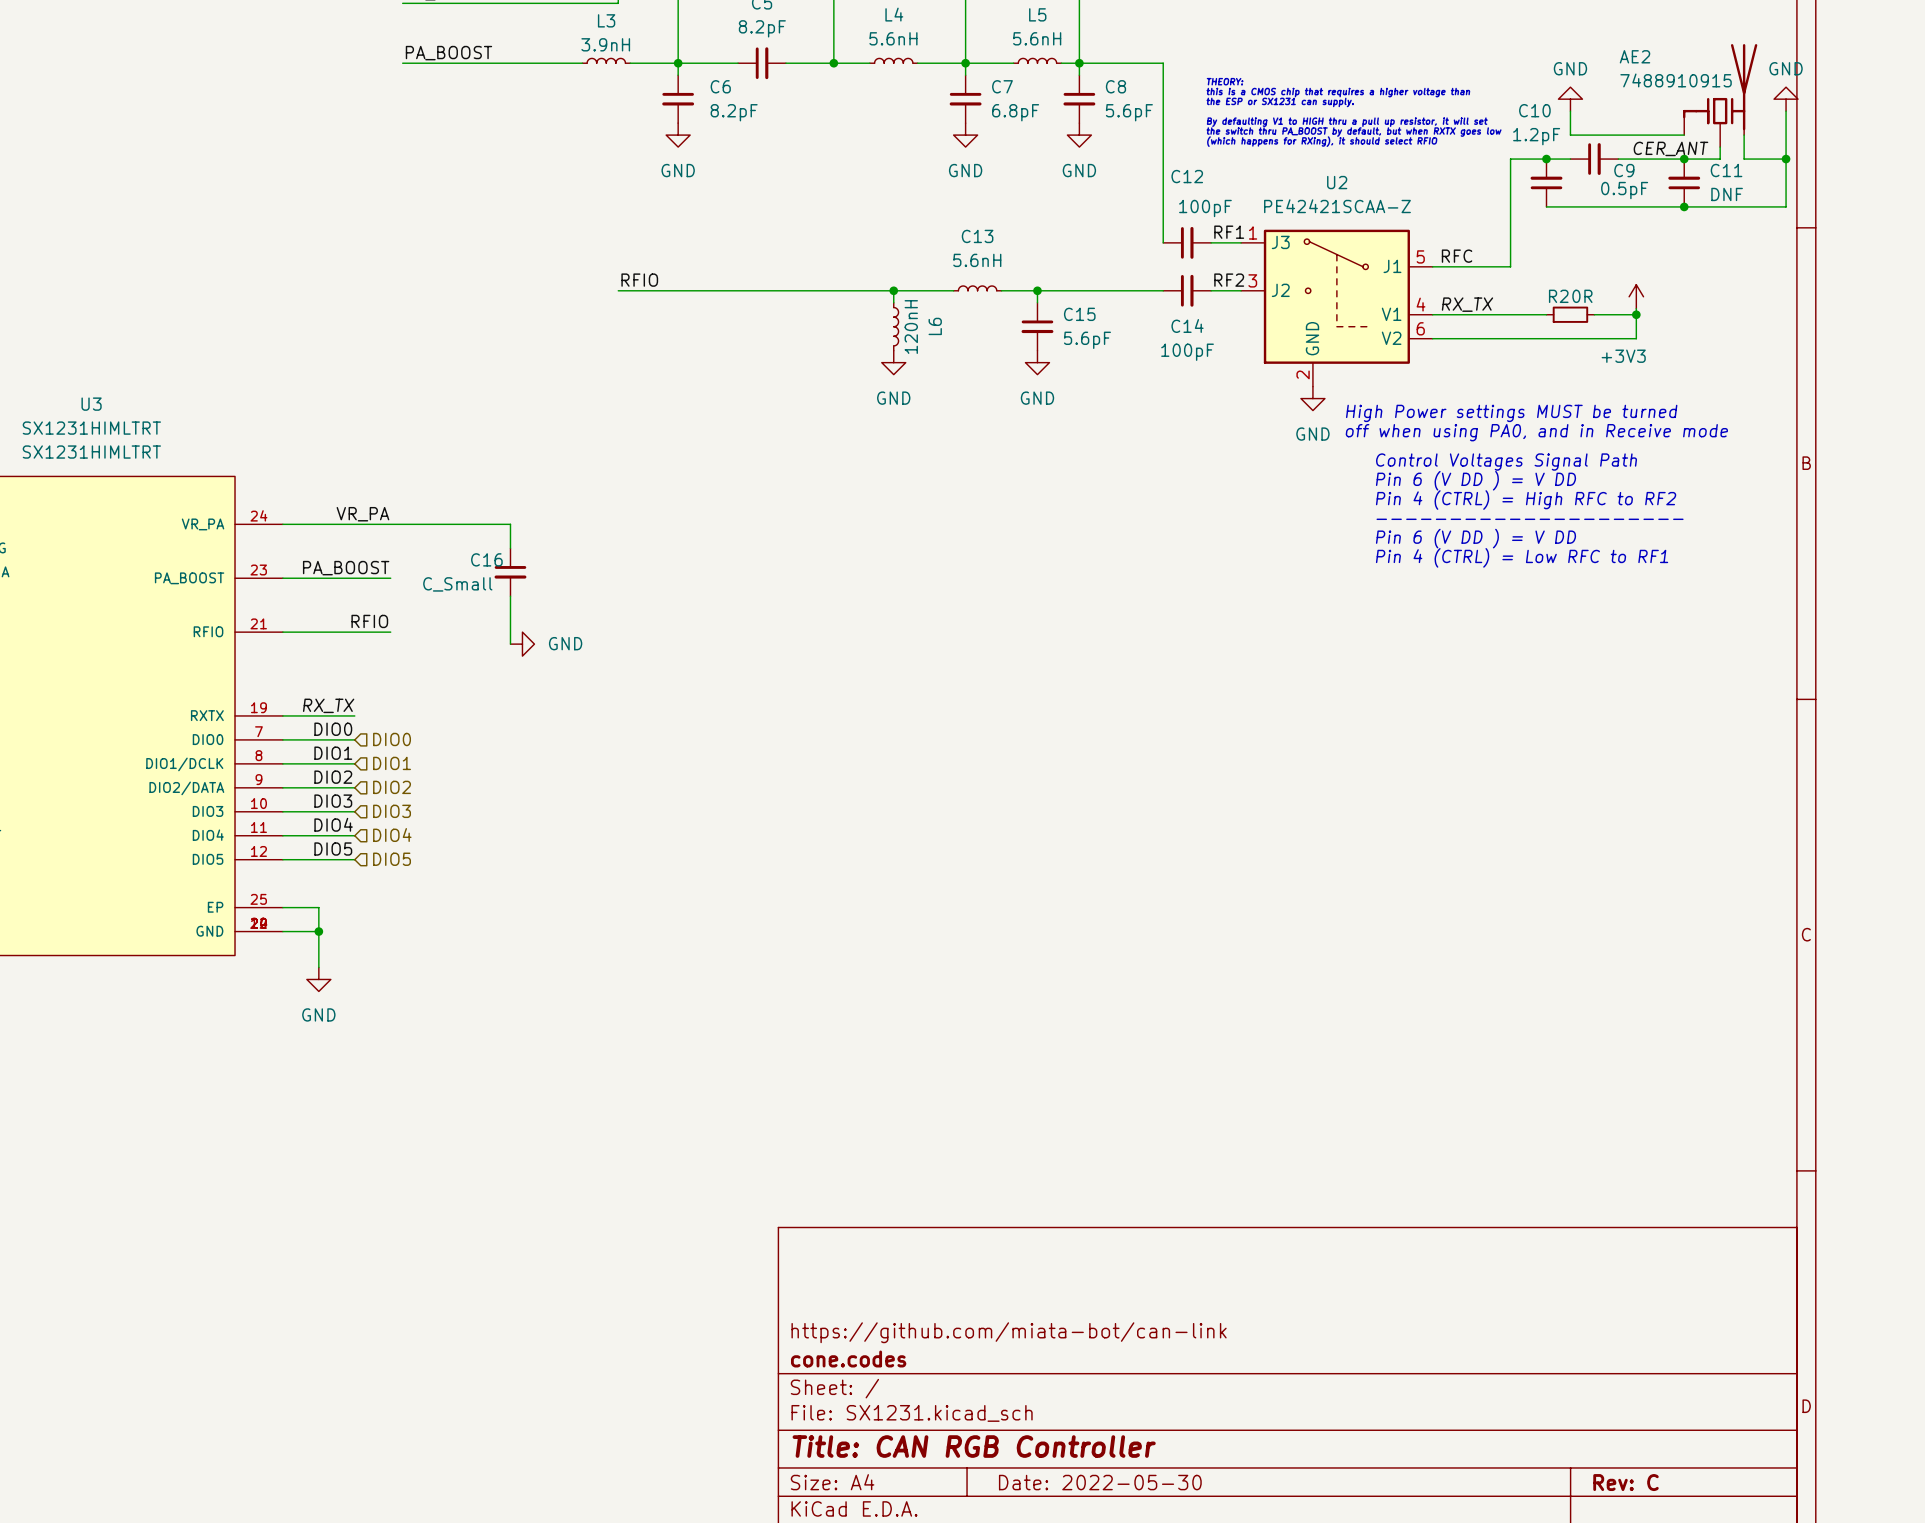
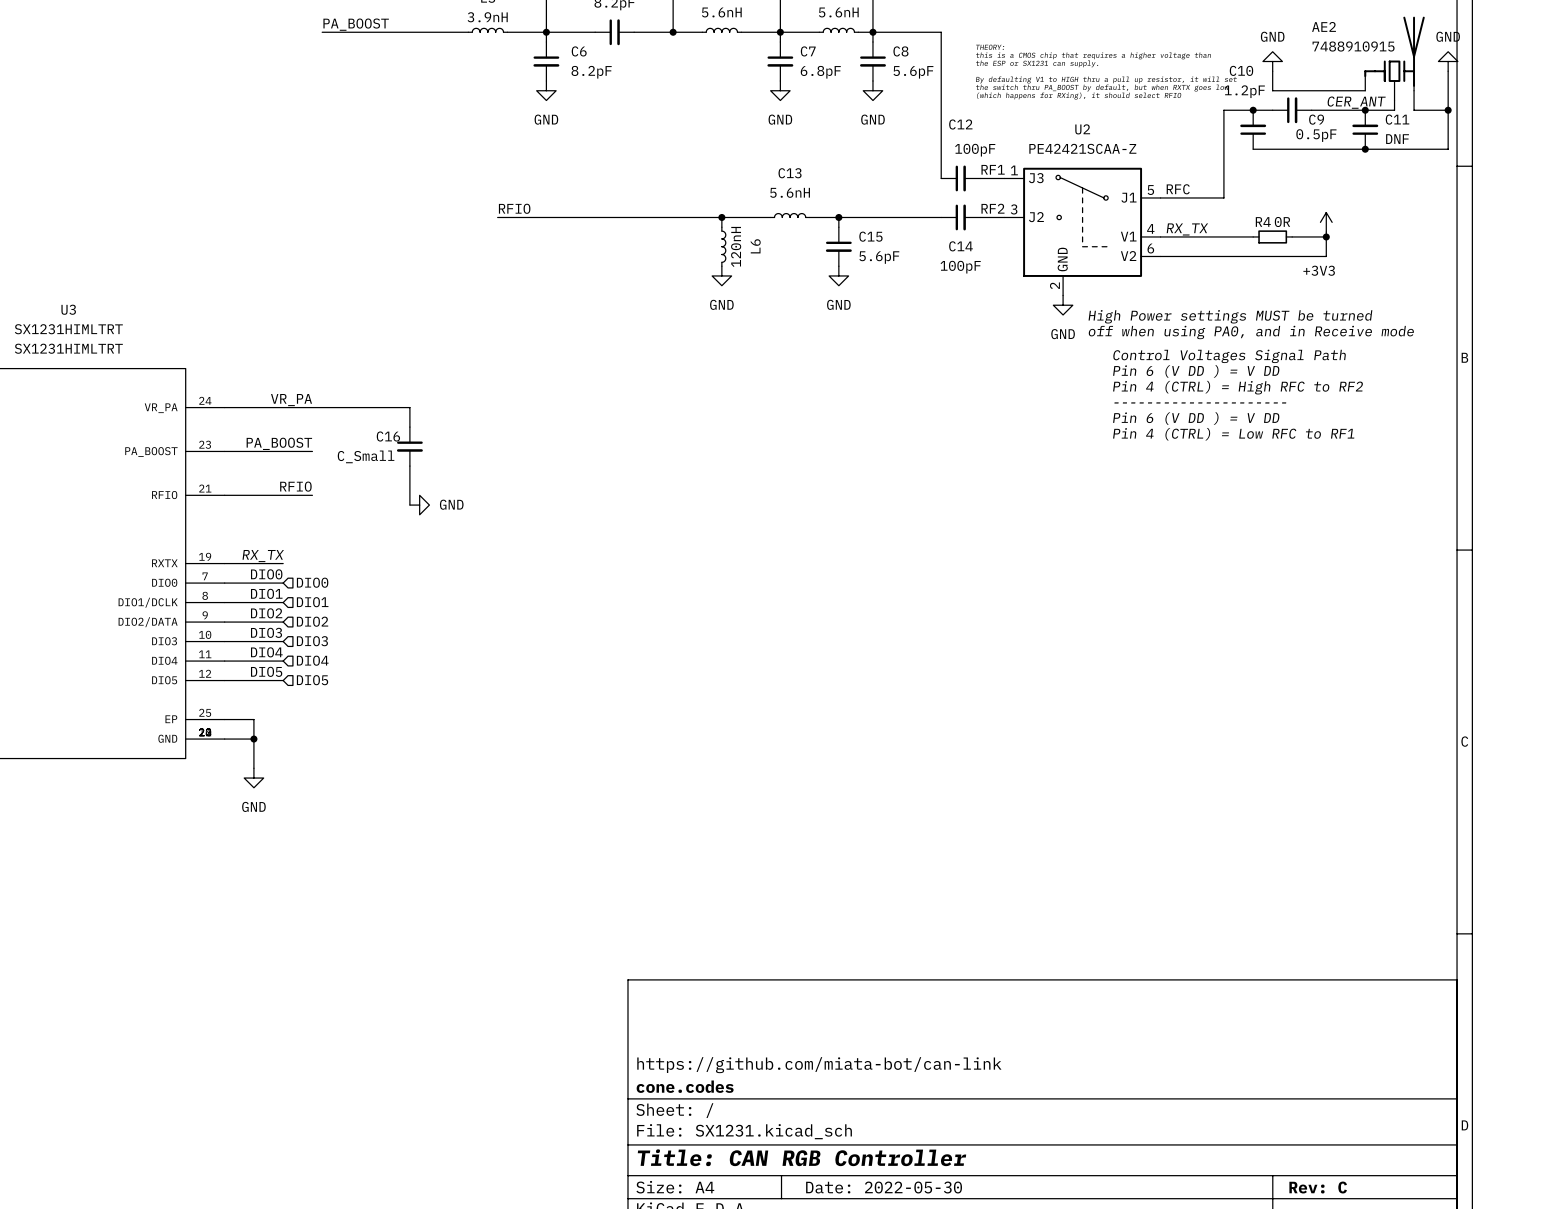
R2 name: R2 (1558, 296) -> R4 (1263, 221)

